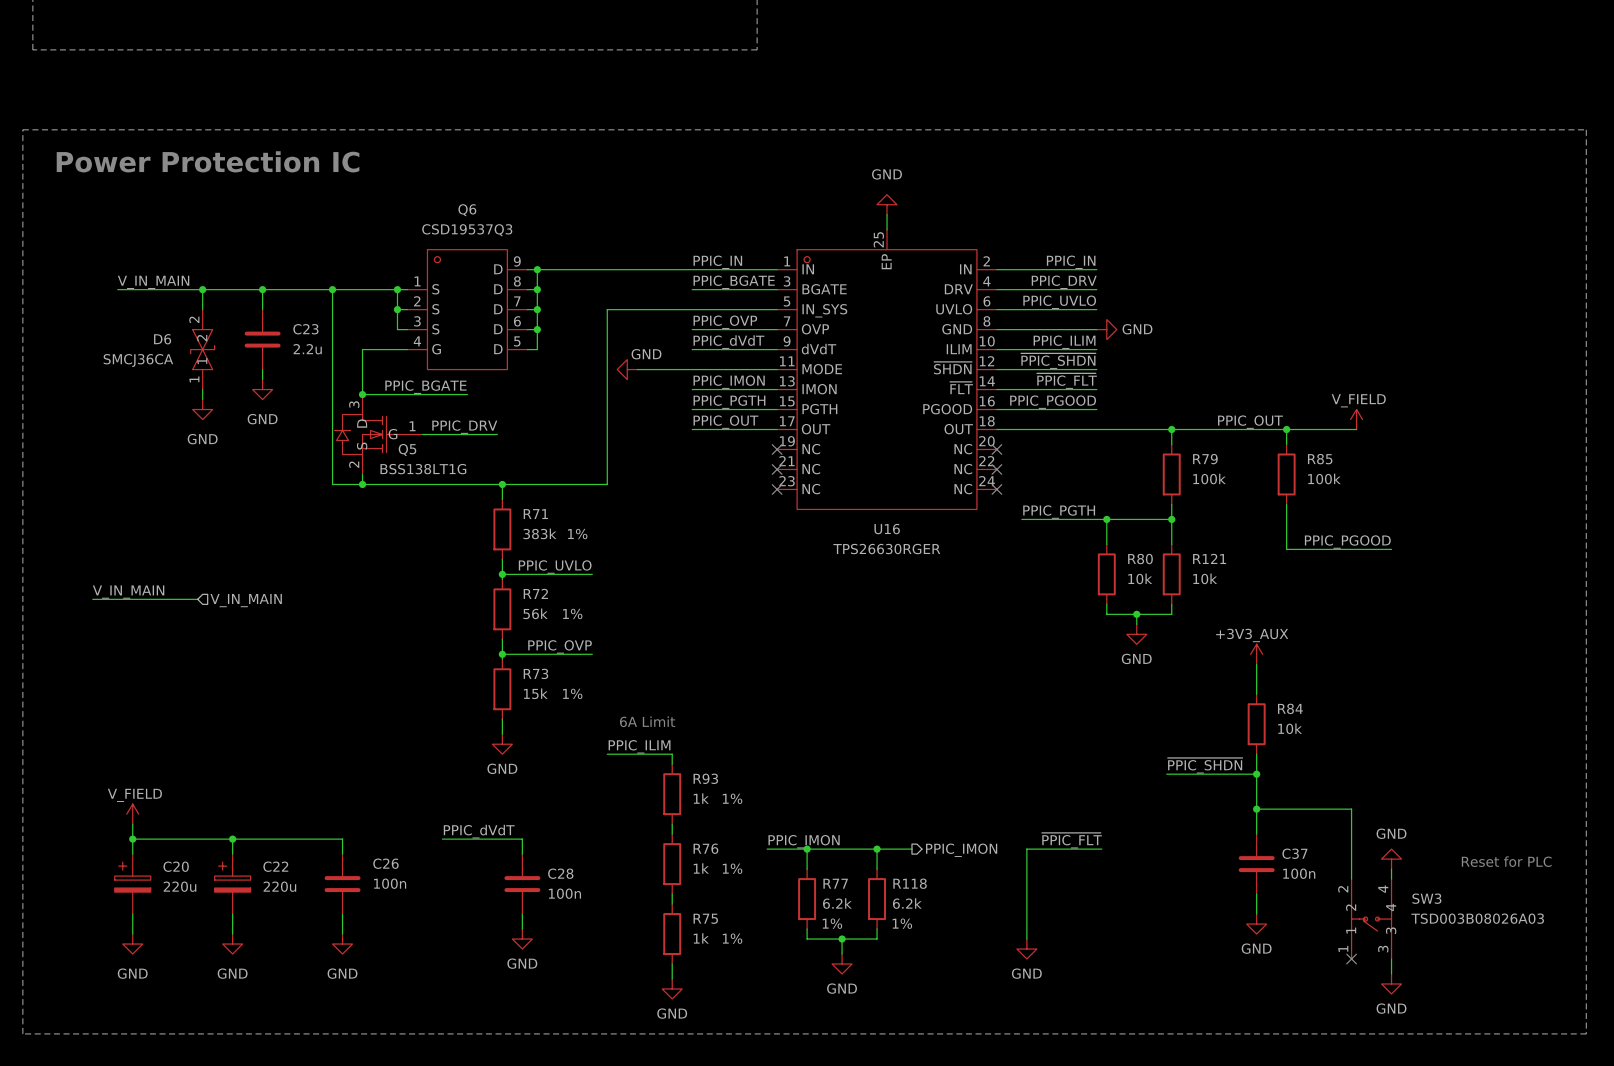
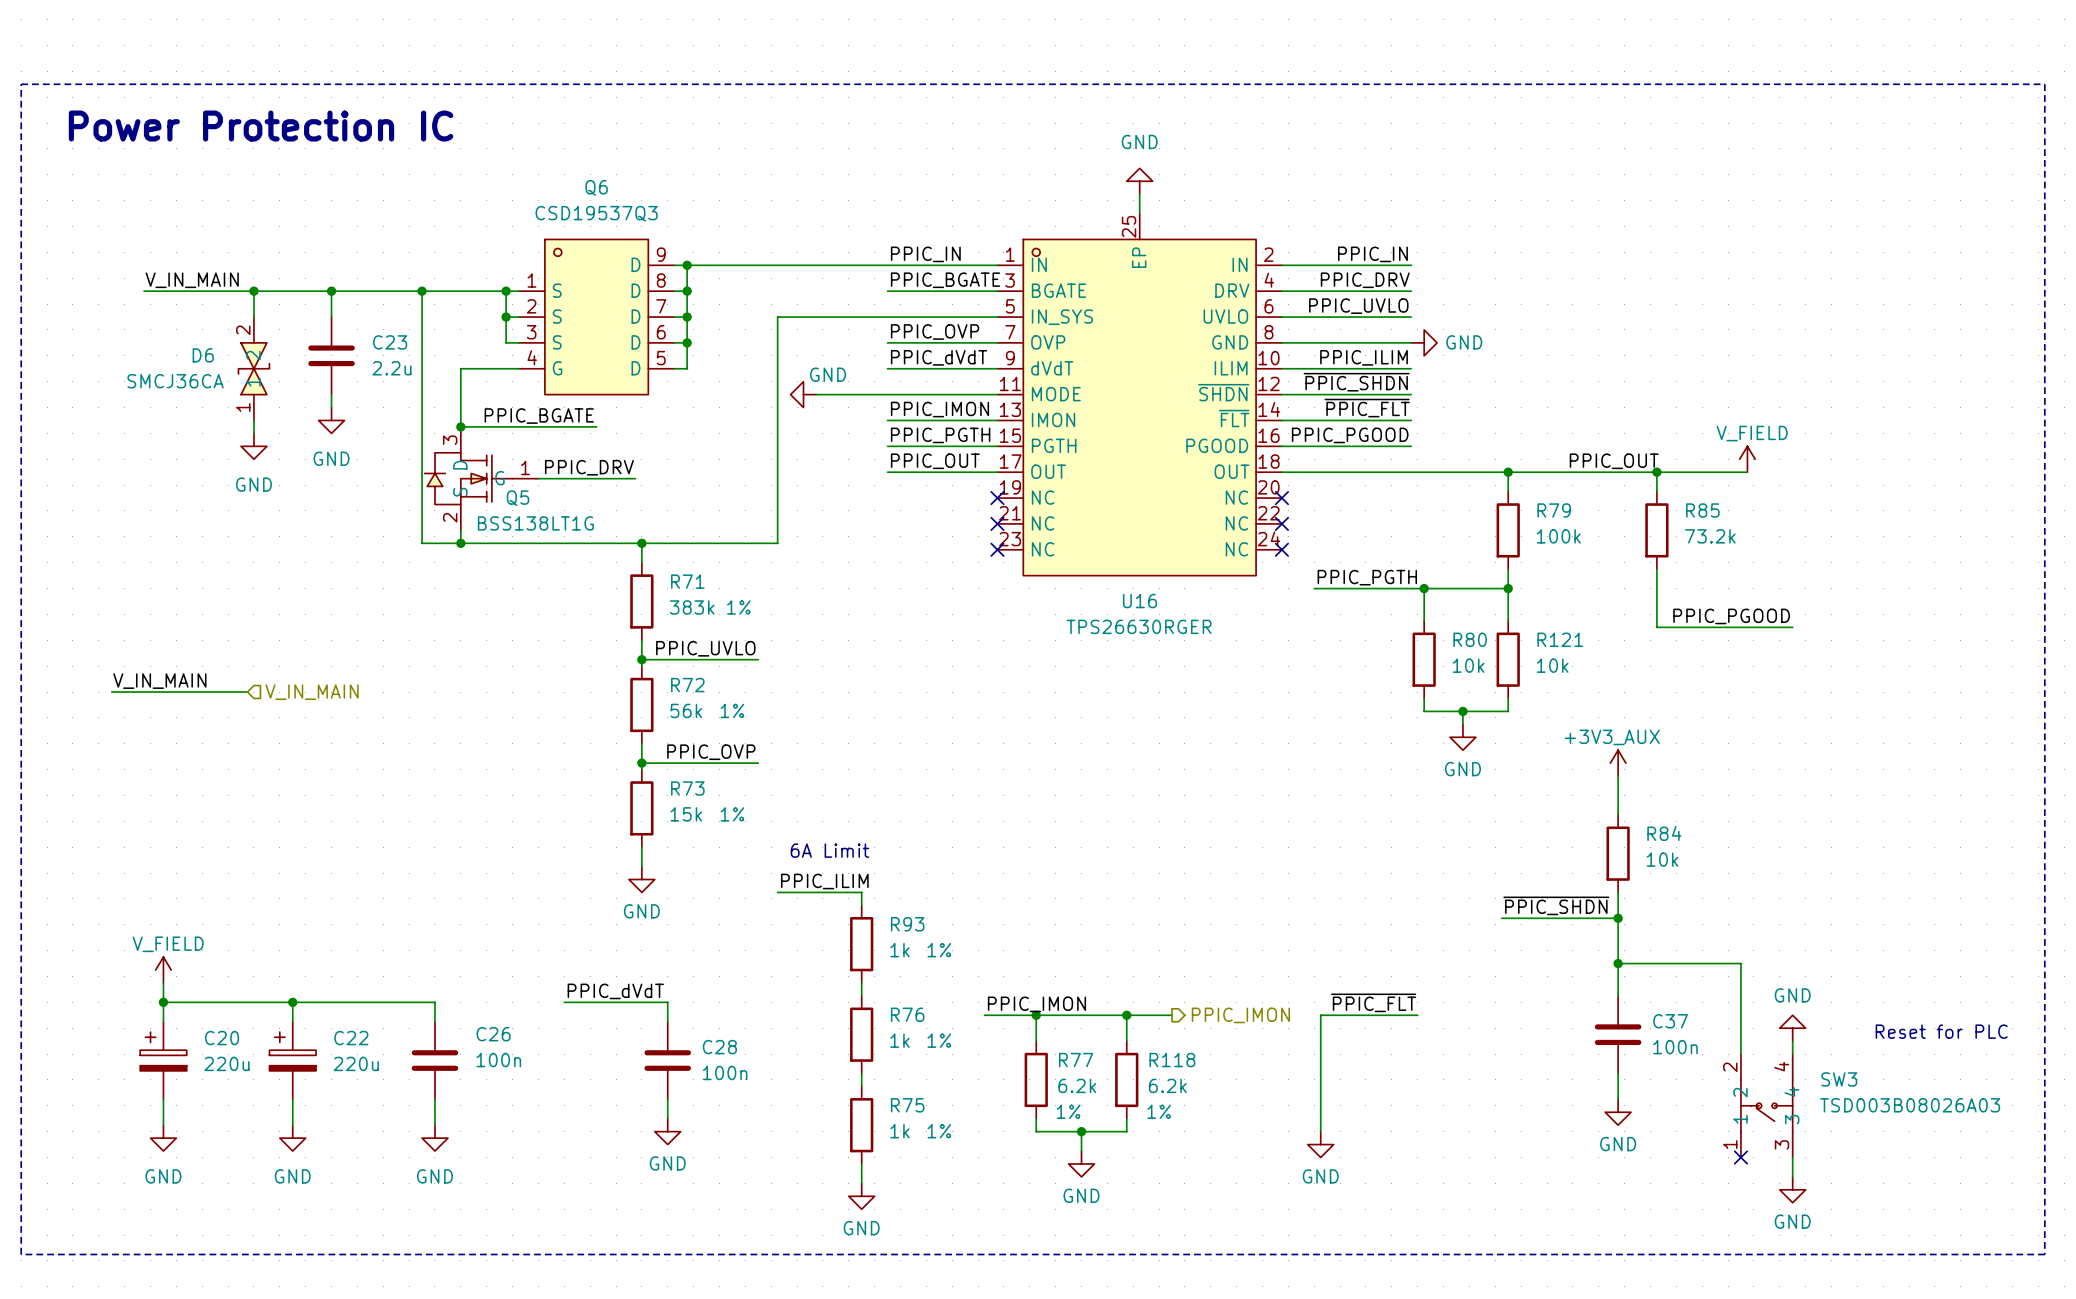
R85 value: 100k (1324, 478) -> 73.2k (1710, 536)

